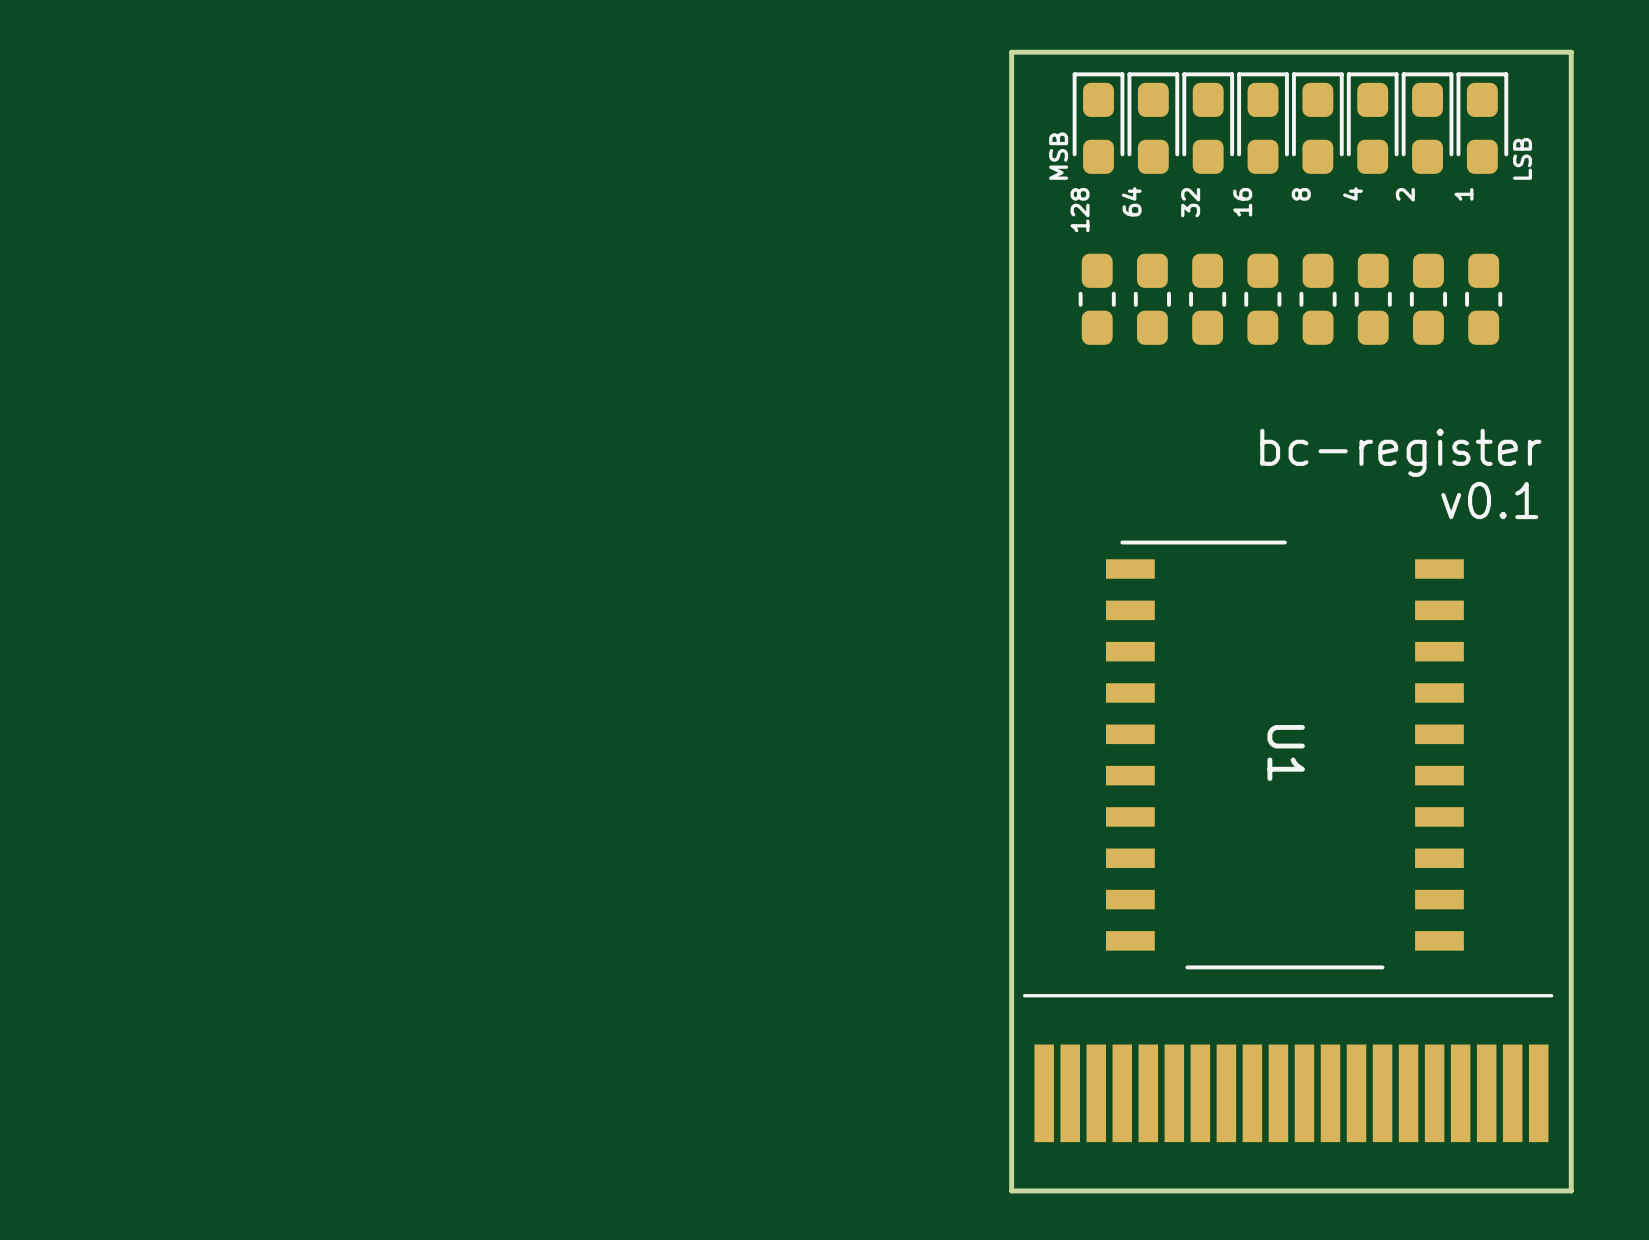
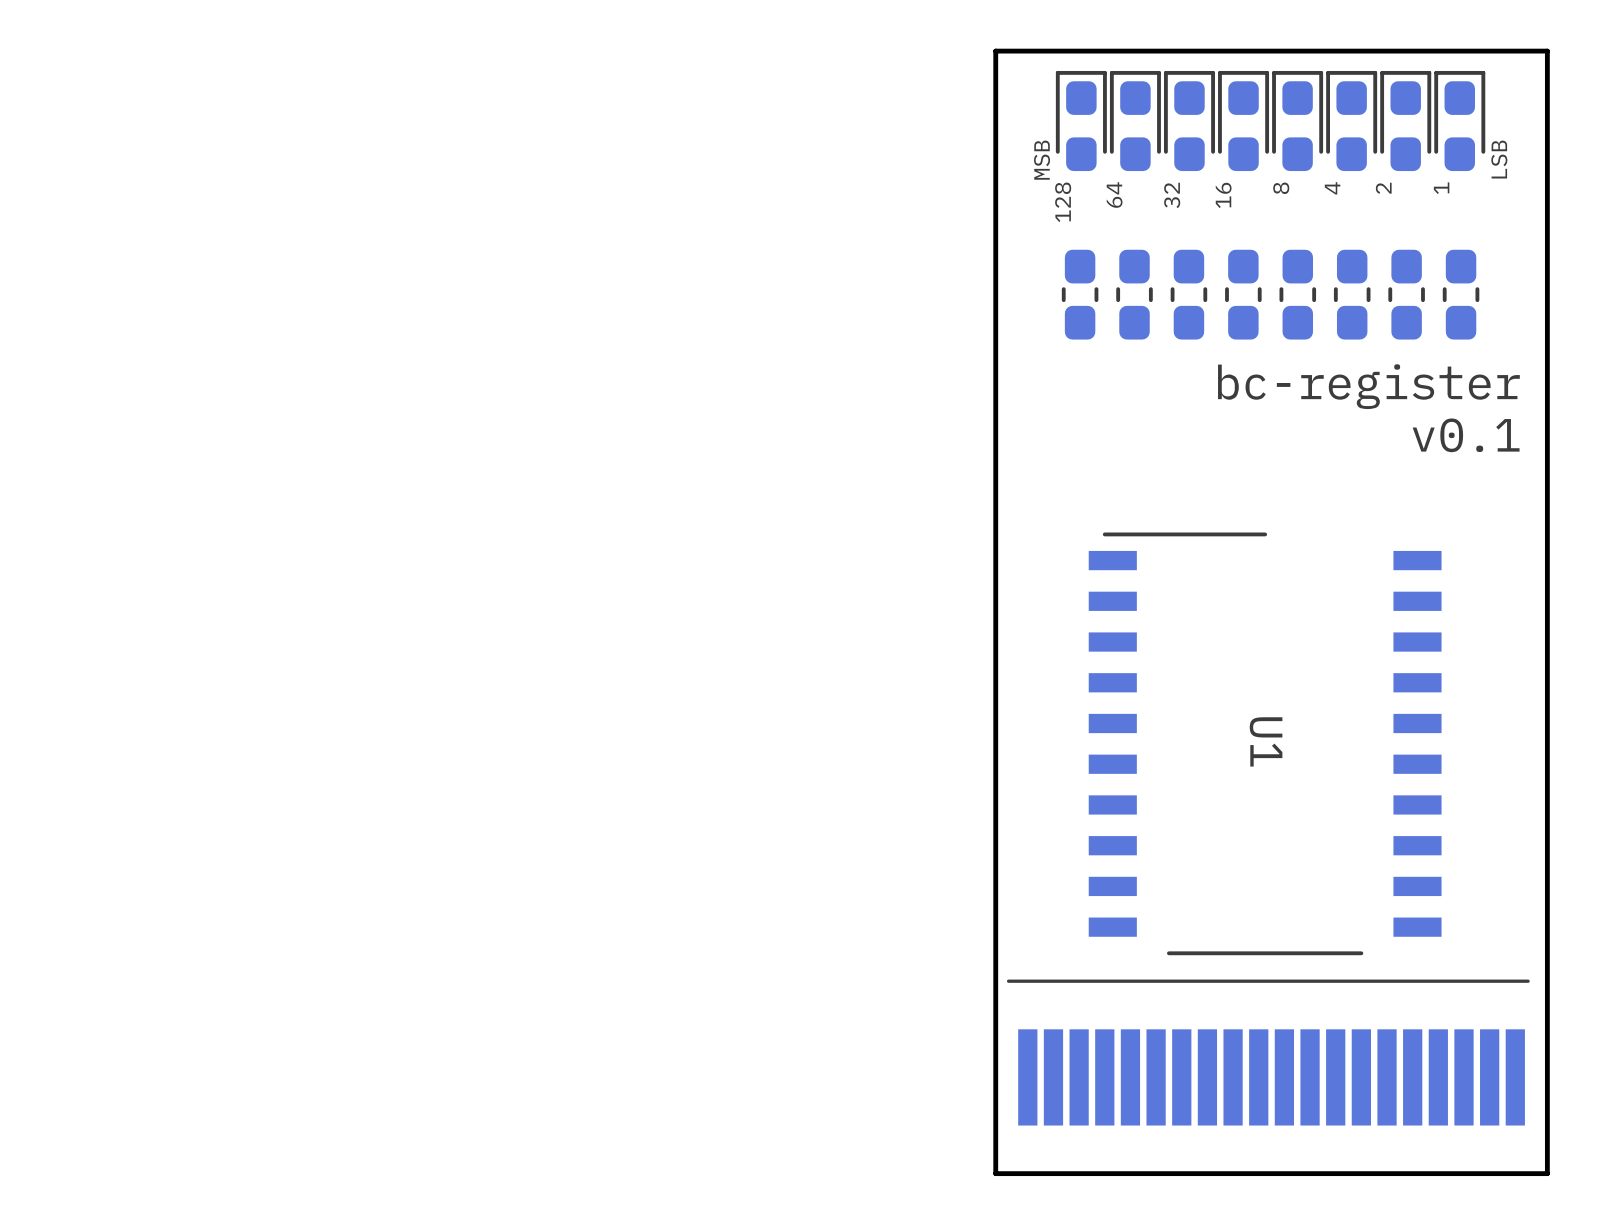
text: none -> bc-register (1368, 386)
text: bc-register (1400, 452) -> v0.1 (1466, 435)
text: v0.1 (1489, 500) -> none

